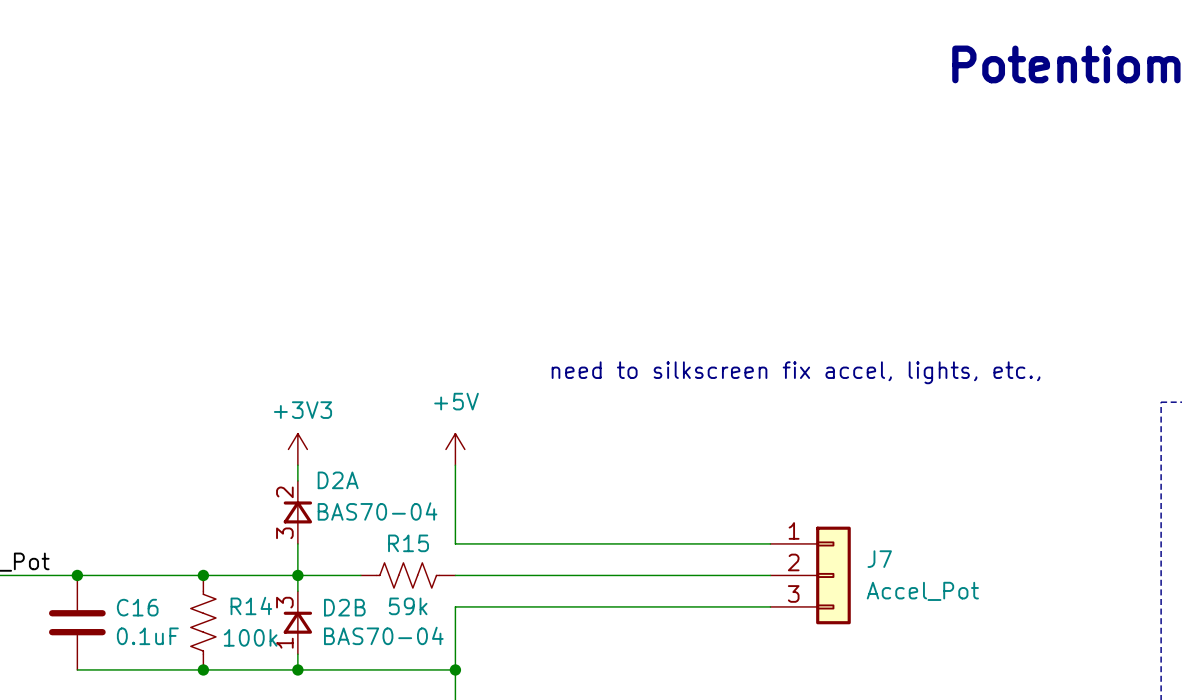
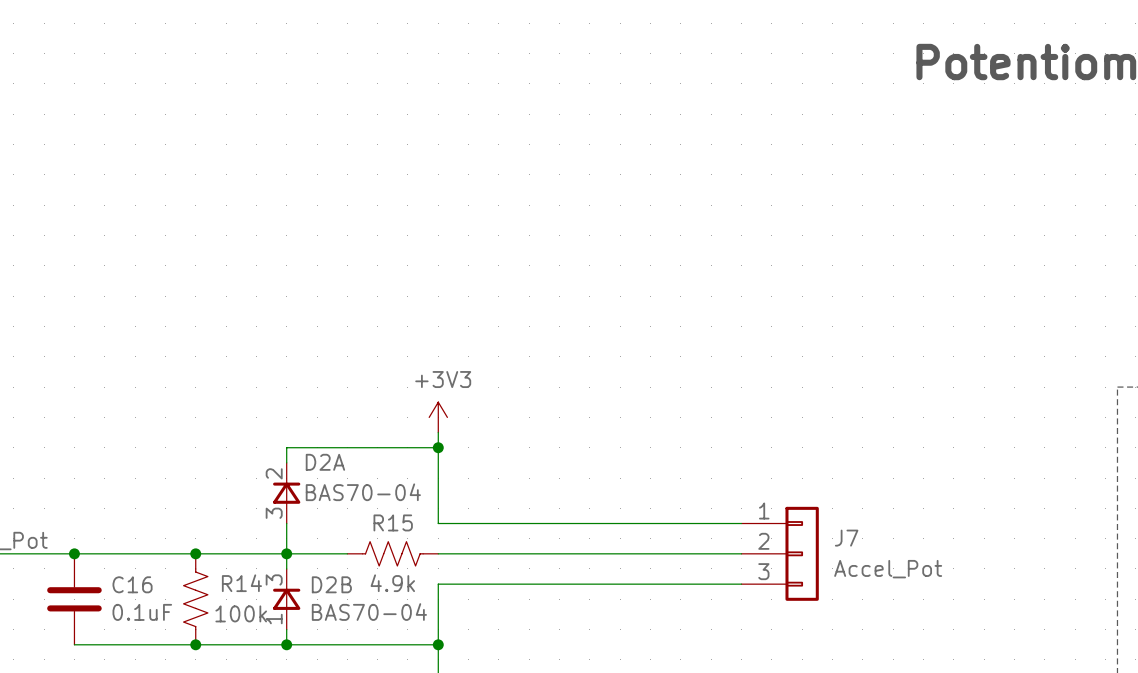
text: need to silkscreen fix accel, lights, etc., (796, 372) -> none
power symbol position: +3V3 (297, 449) -> +3V3 (438, 417)
wire: none -> (438, 432) (438, 447) (286, 447)
power symbol: +5V (455, 449) -> none
junction: none -> (438, 447)
R15 value: 59k (408, 606) -> 4.9k (392, 583)

